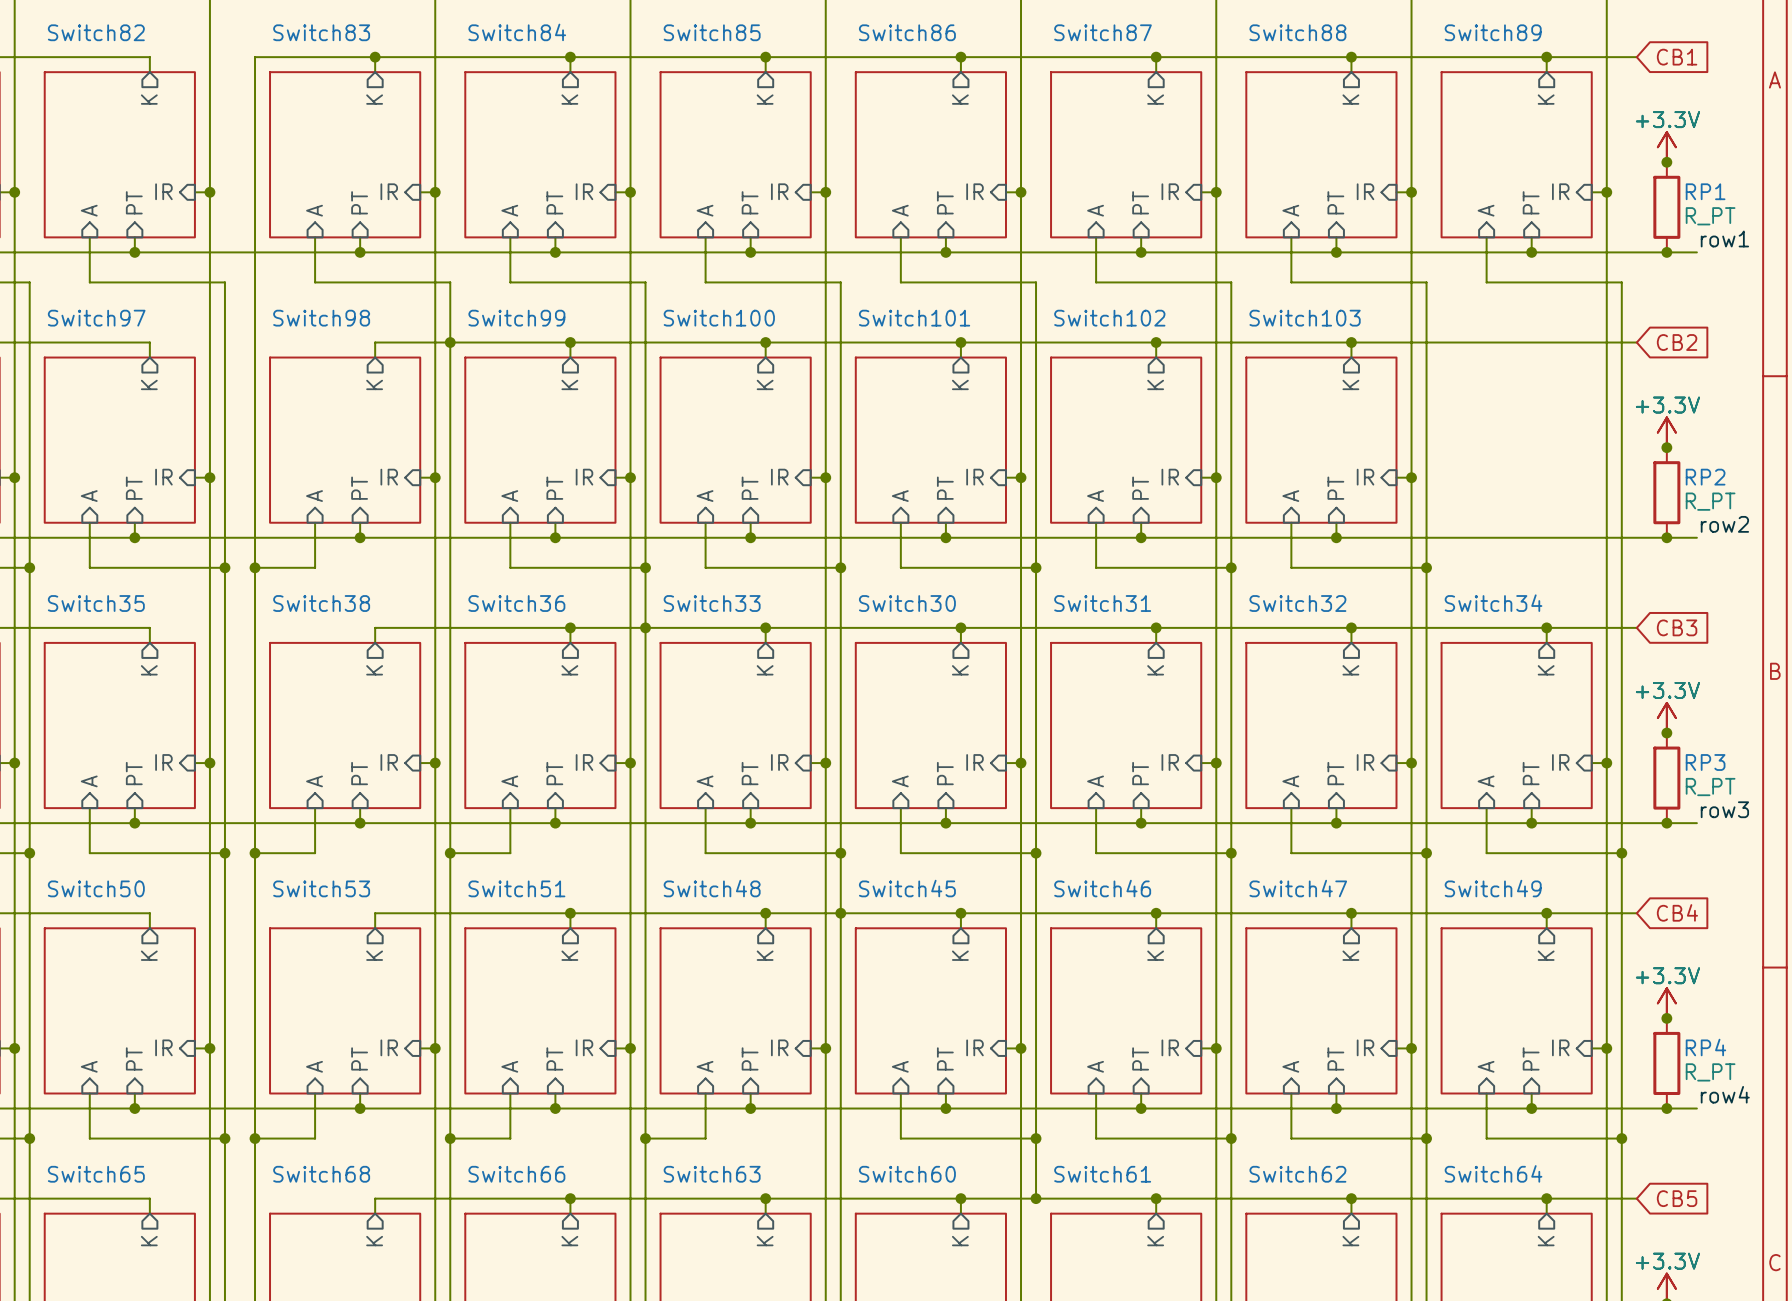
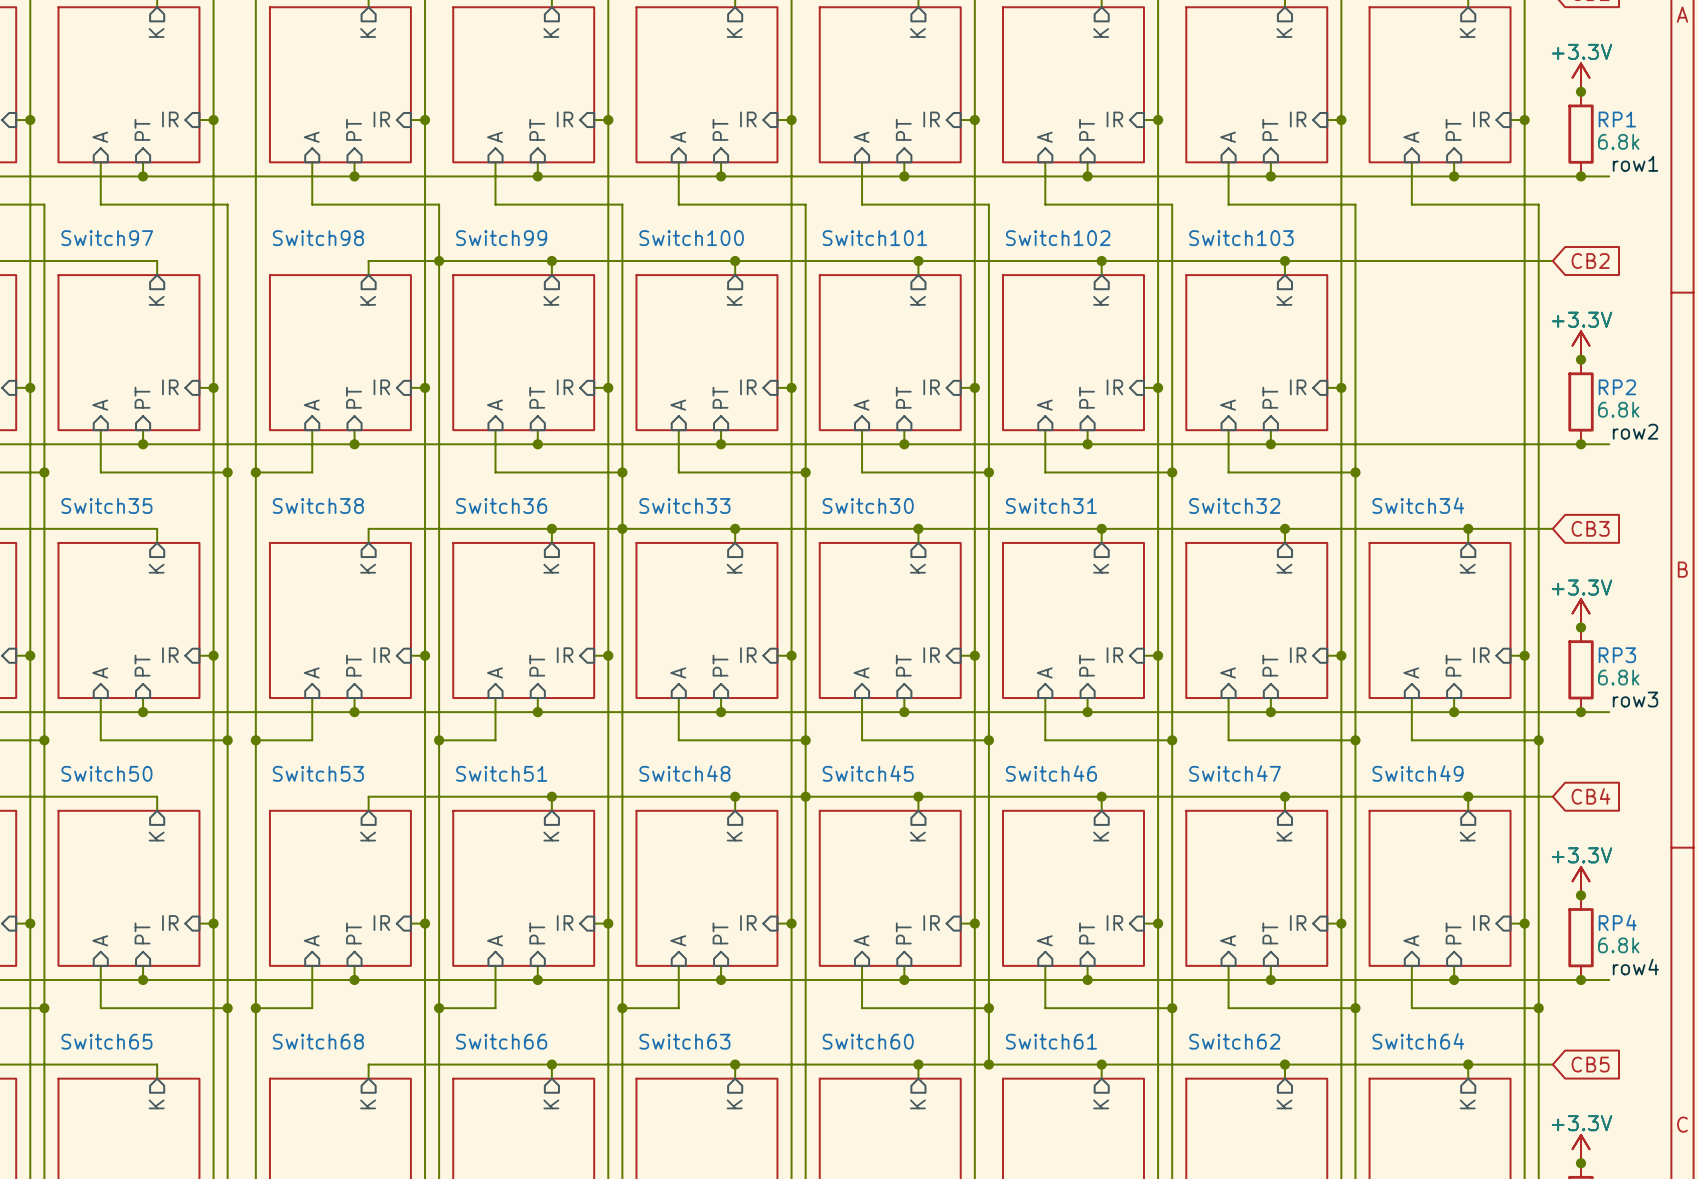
RP1 value: R_PT (1710, 216) -> 6.8k (1618, 141)
RP2 value: R_PT (1710, 501) -> 6.8k (1618, 409)
RP3 value: R_PT (1710, 787) -> 6.8k (1618, 677)
RP4 value: R_PT (1710, 1072) -> 6.8k (1618, 945)

